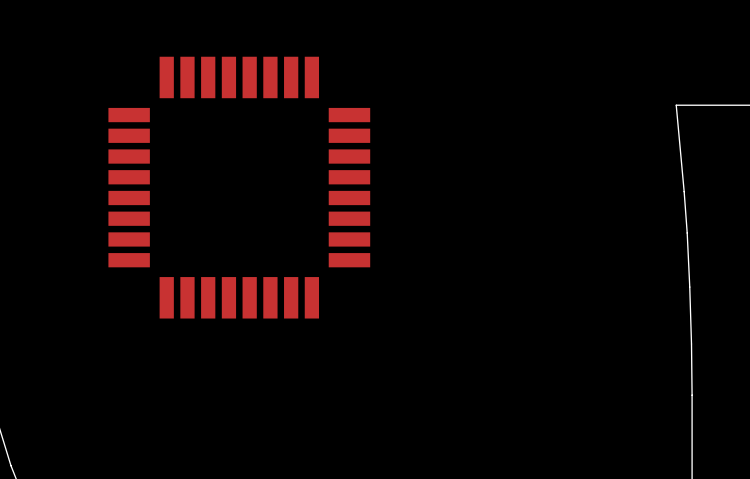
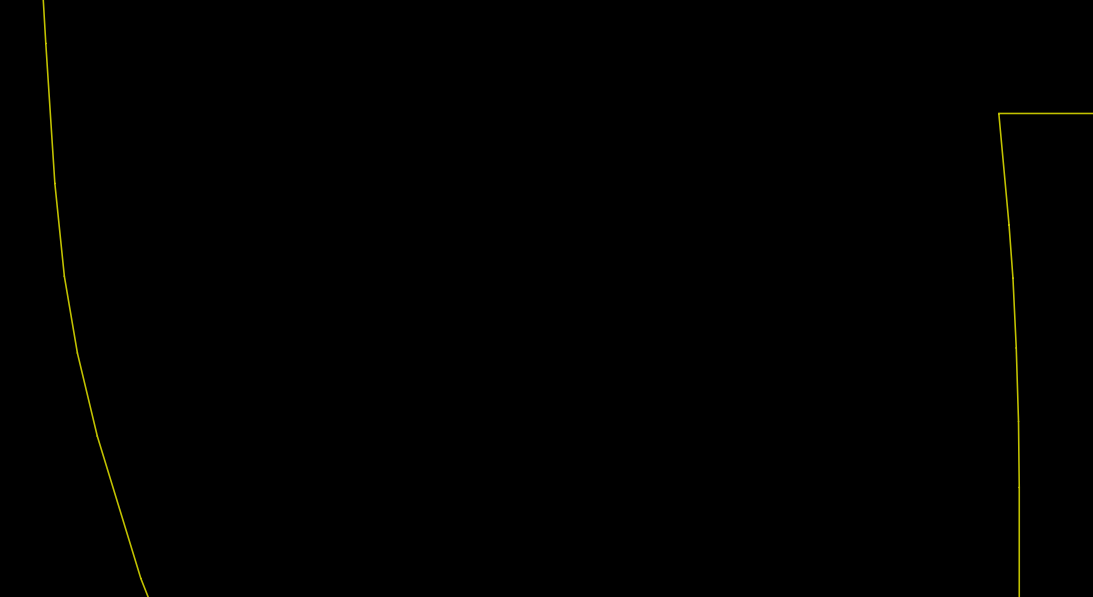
part: (239, 187) -> none

